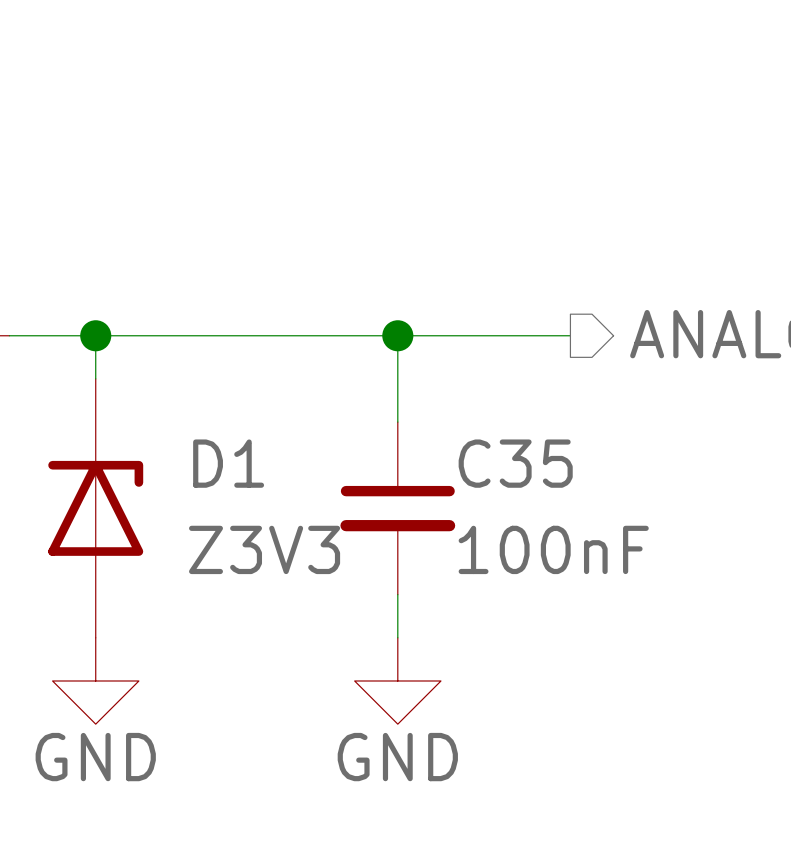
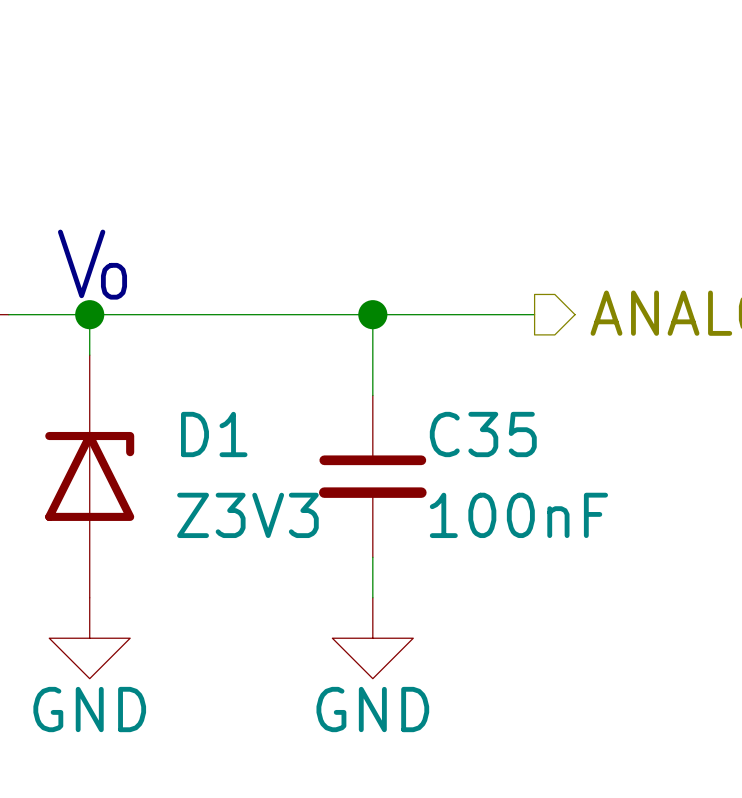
text: none -> V (81, 263)
text: none -> O (113, 281)

